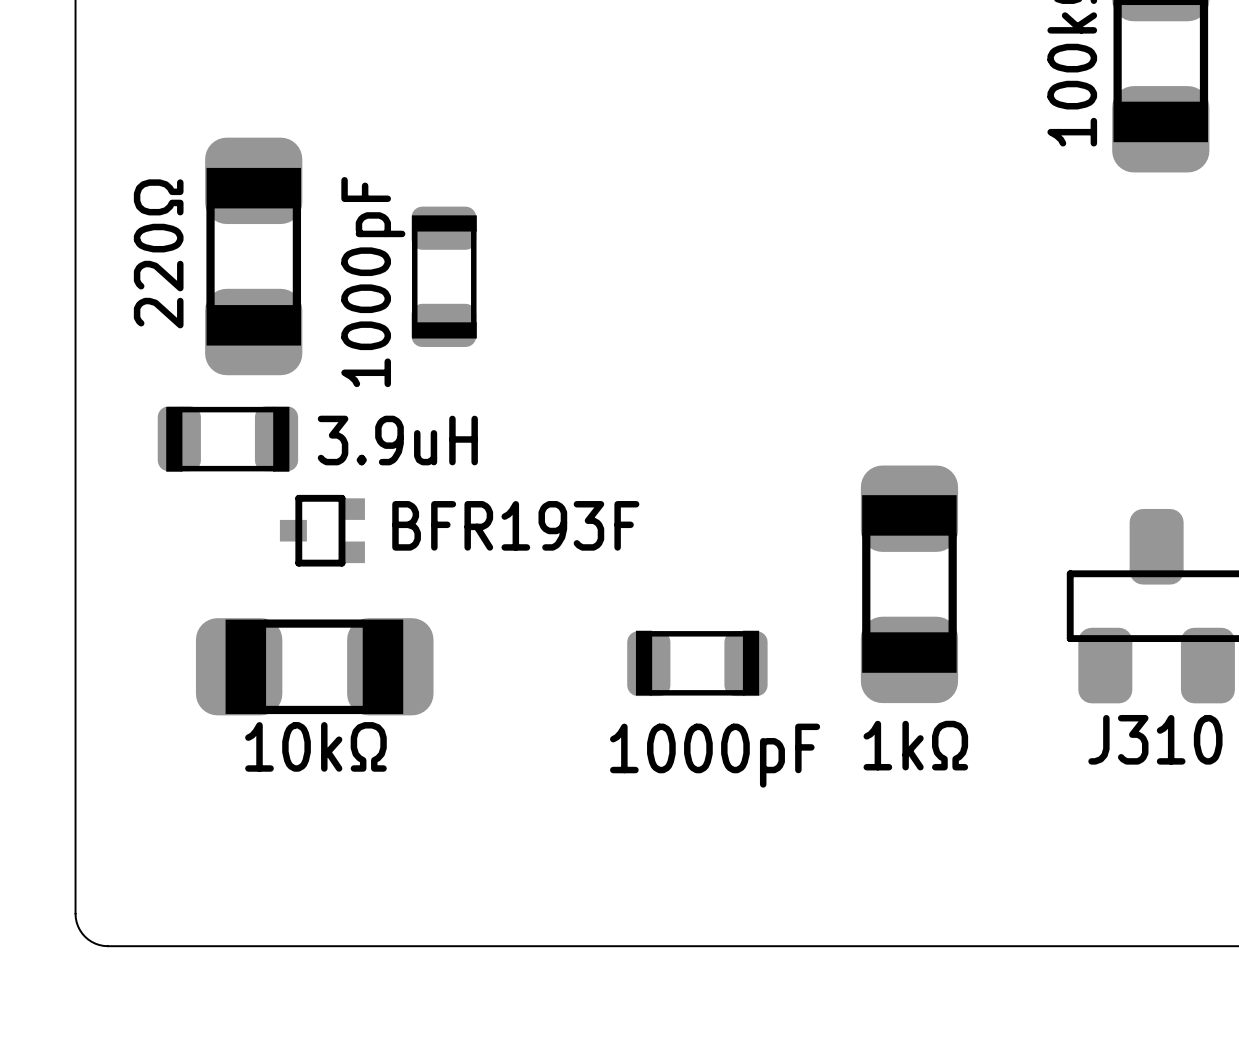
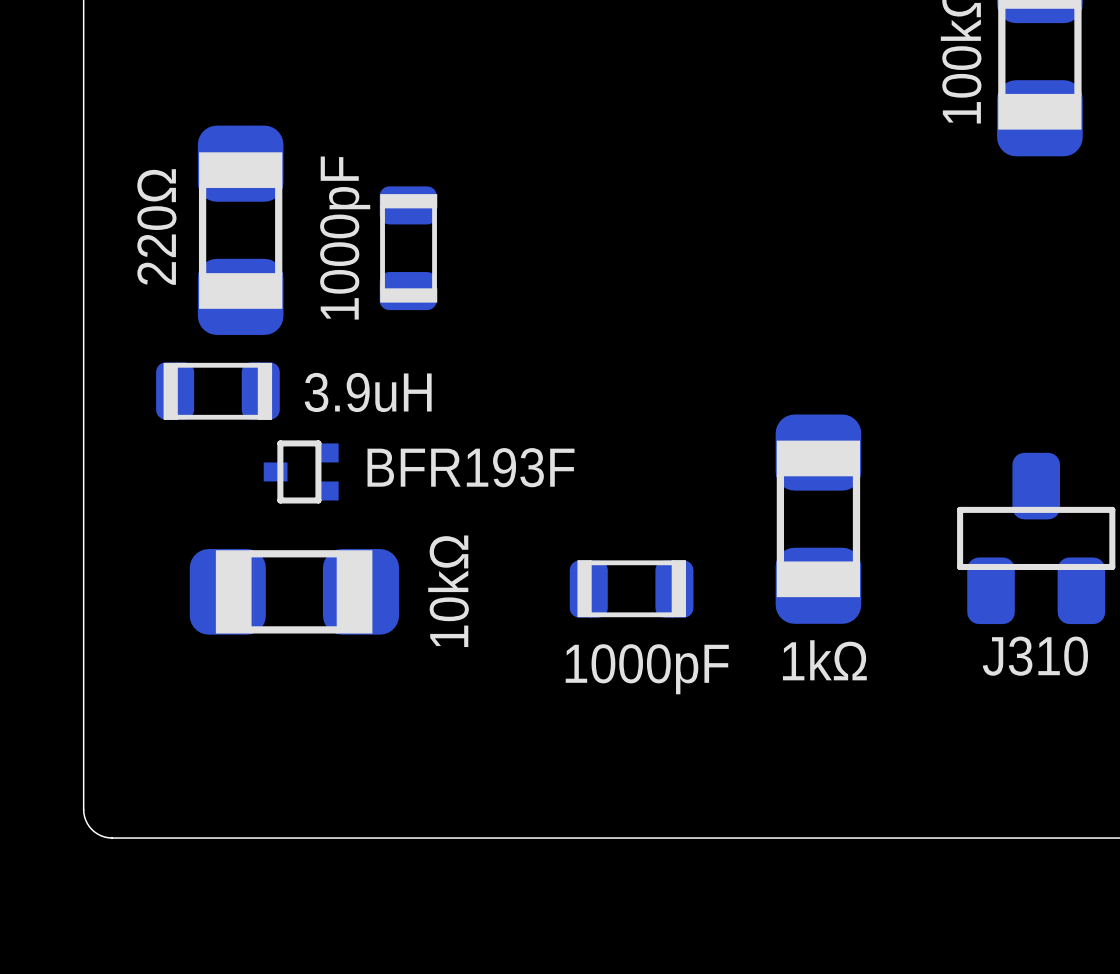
part value rotation: 0° (315, 746) -> 90° counterclockwise (448, 591)
part value position: 10kΩ (315, 746) -> 10kΩ (448, 591)

